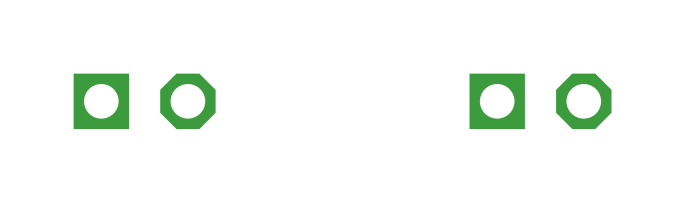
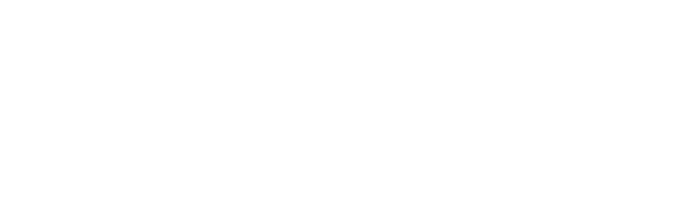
part: (144, 101) -> none
part: (540, 101) -> none

